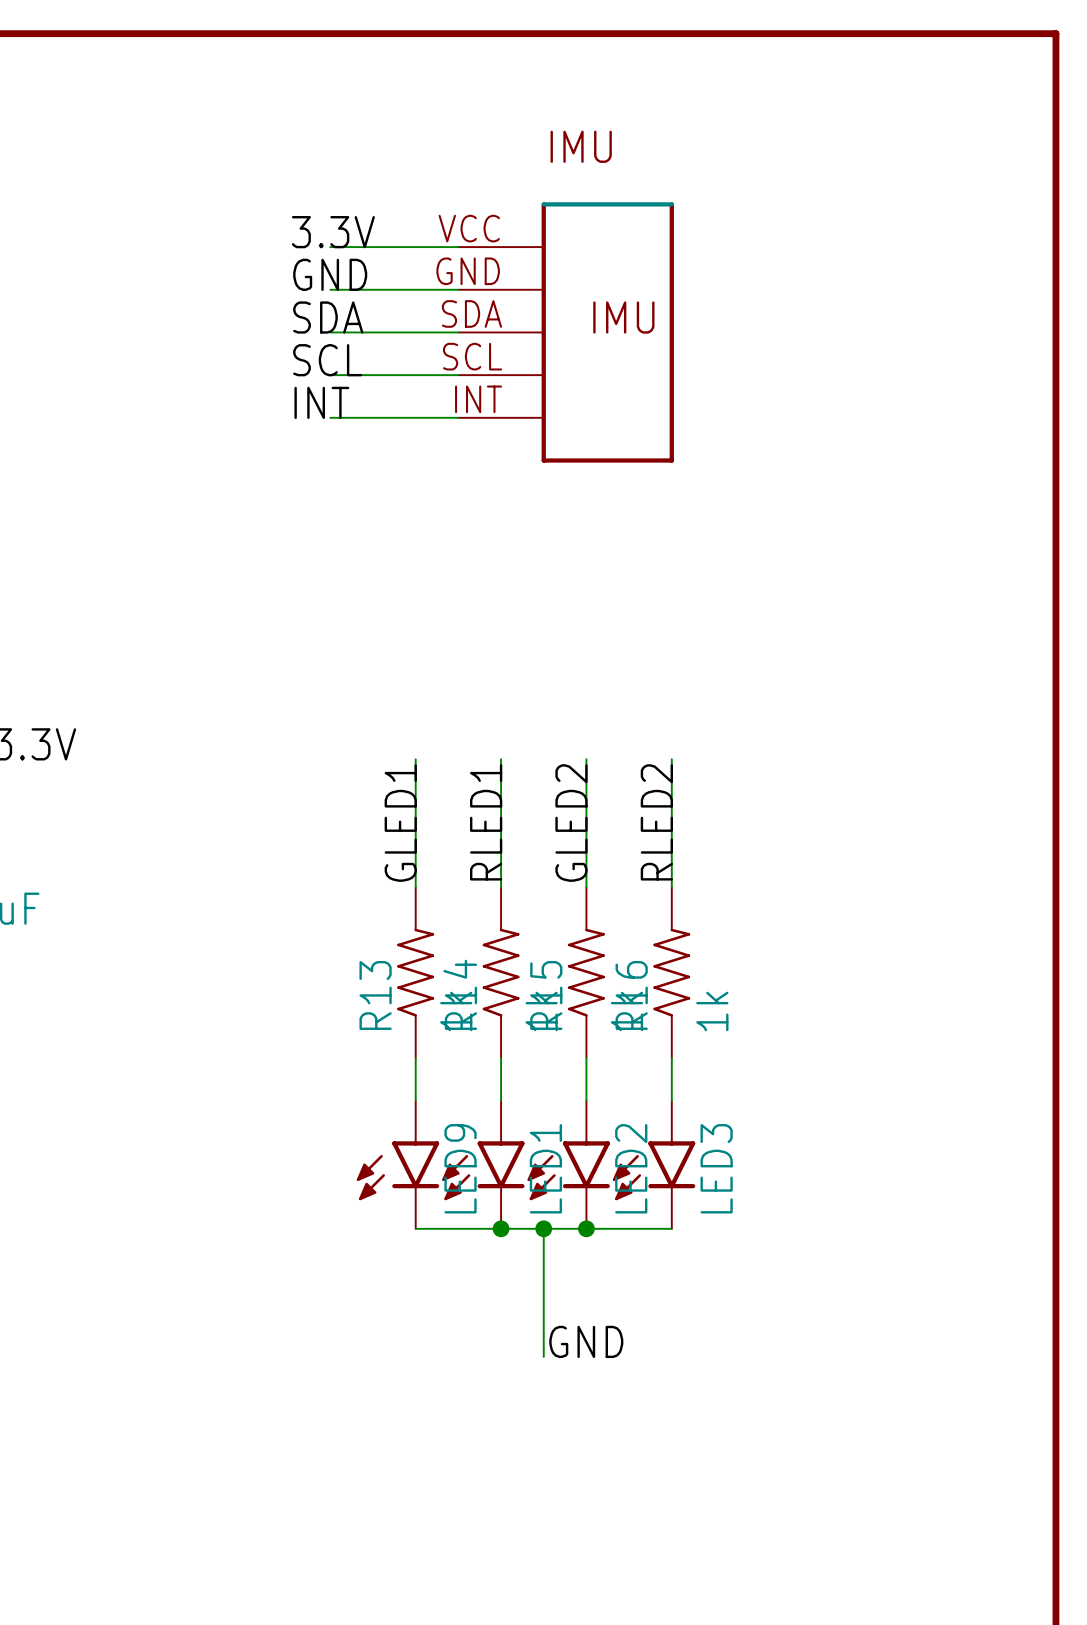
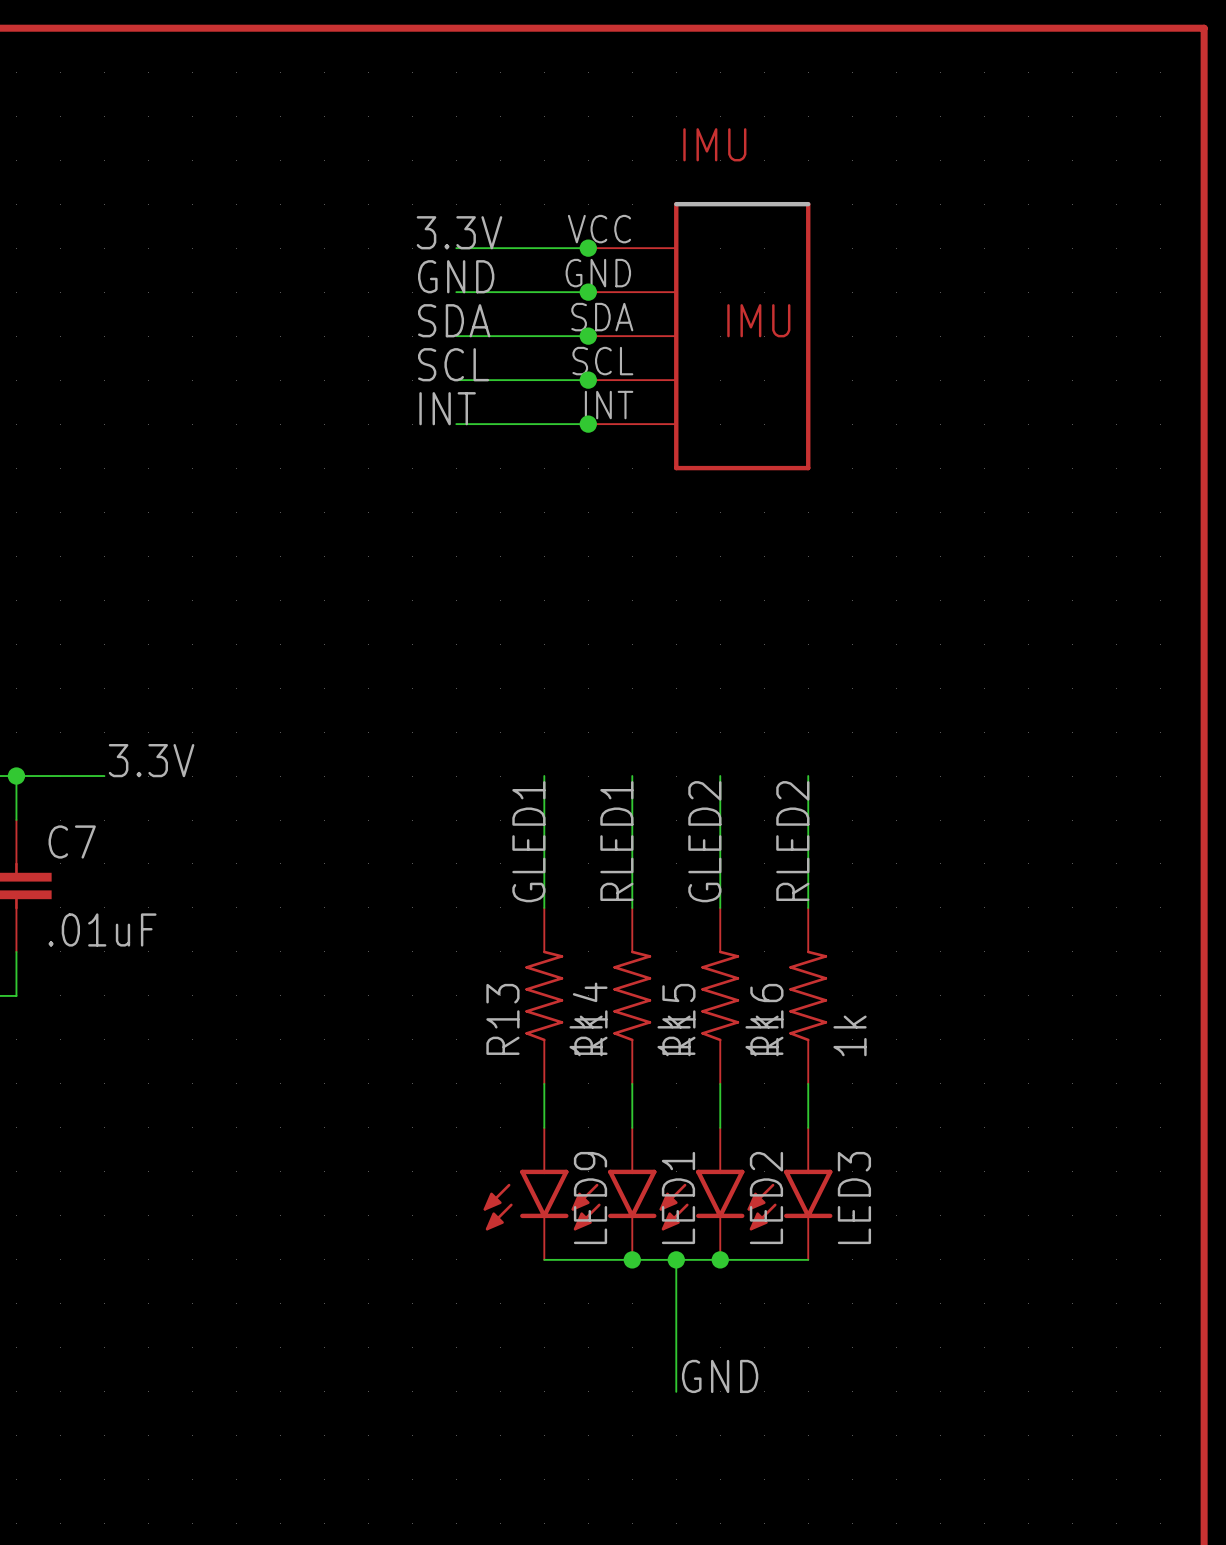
junction: none -> (588, 248)
junction: none -> (588, 292)
junction: none -> (588, 336)
junction: none -> (588, 380)
junction: none -> (588, 424)

